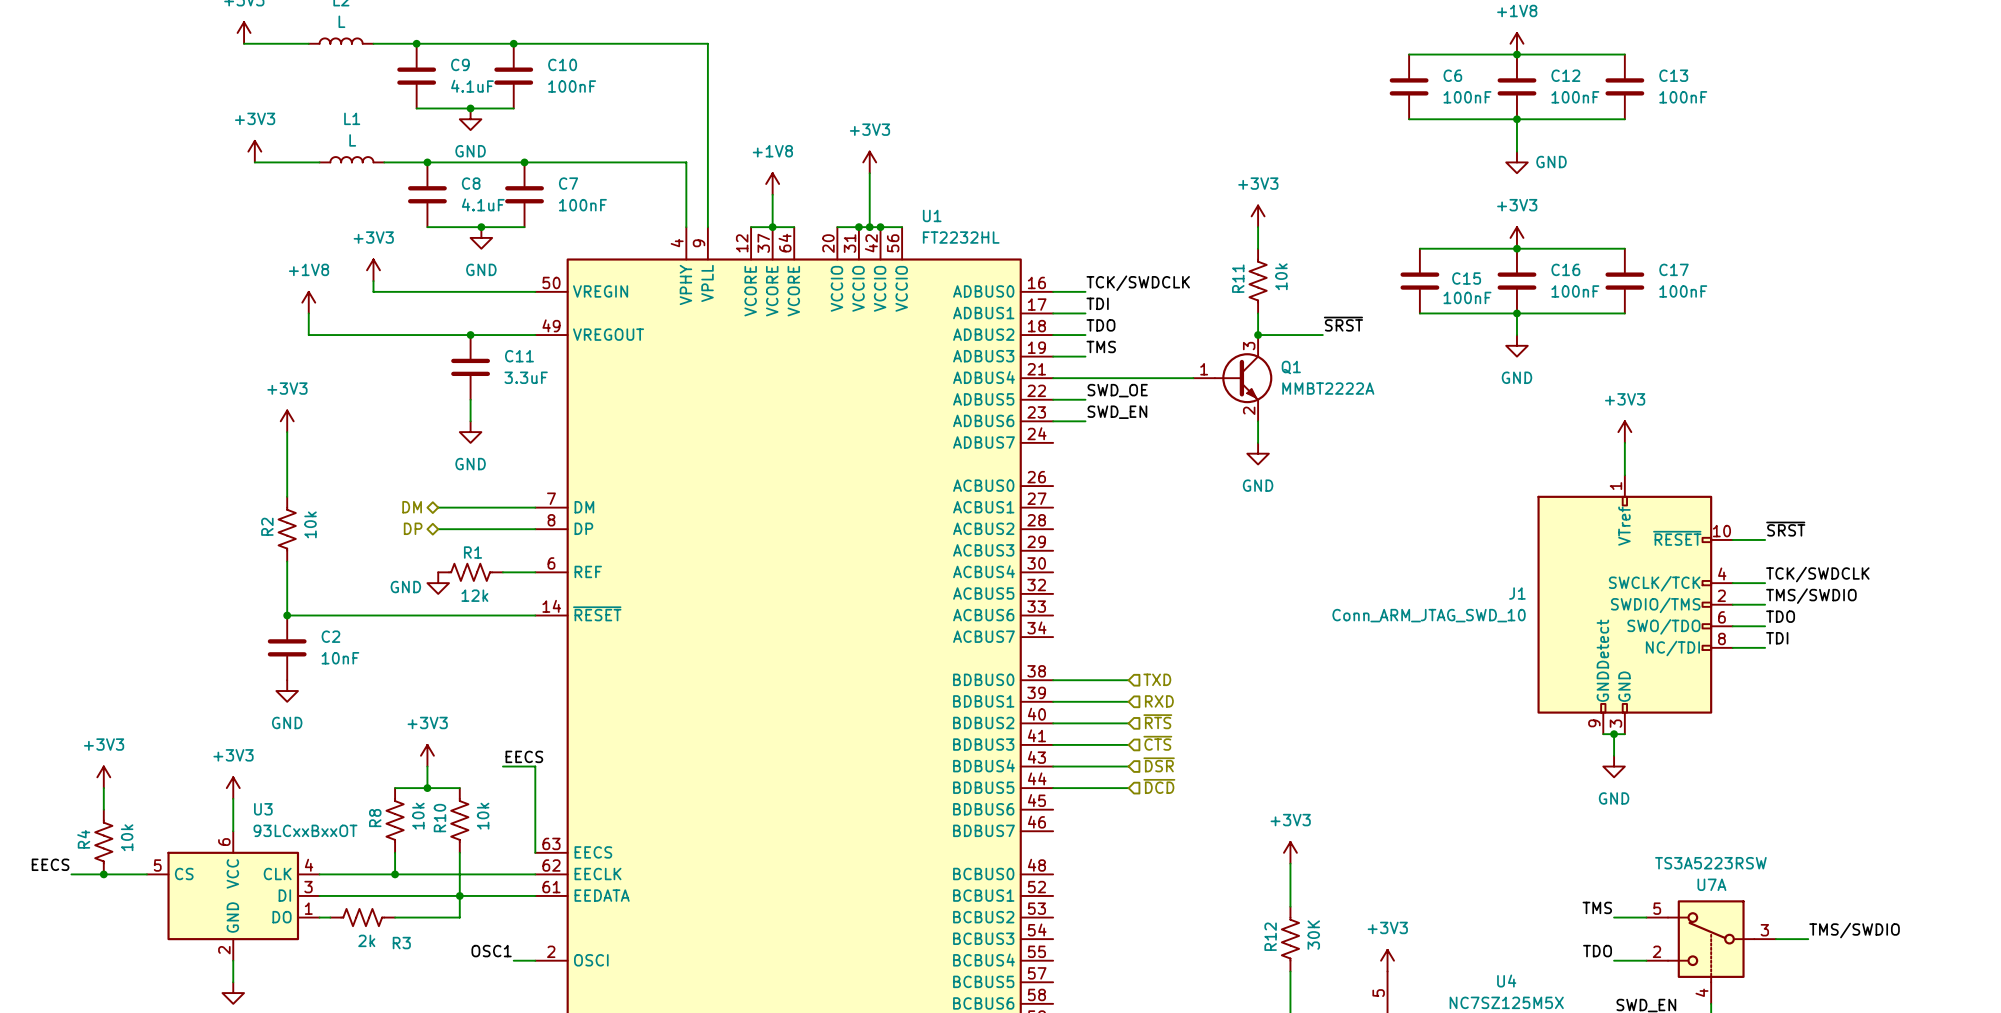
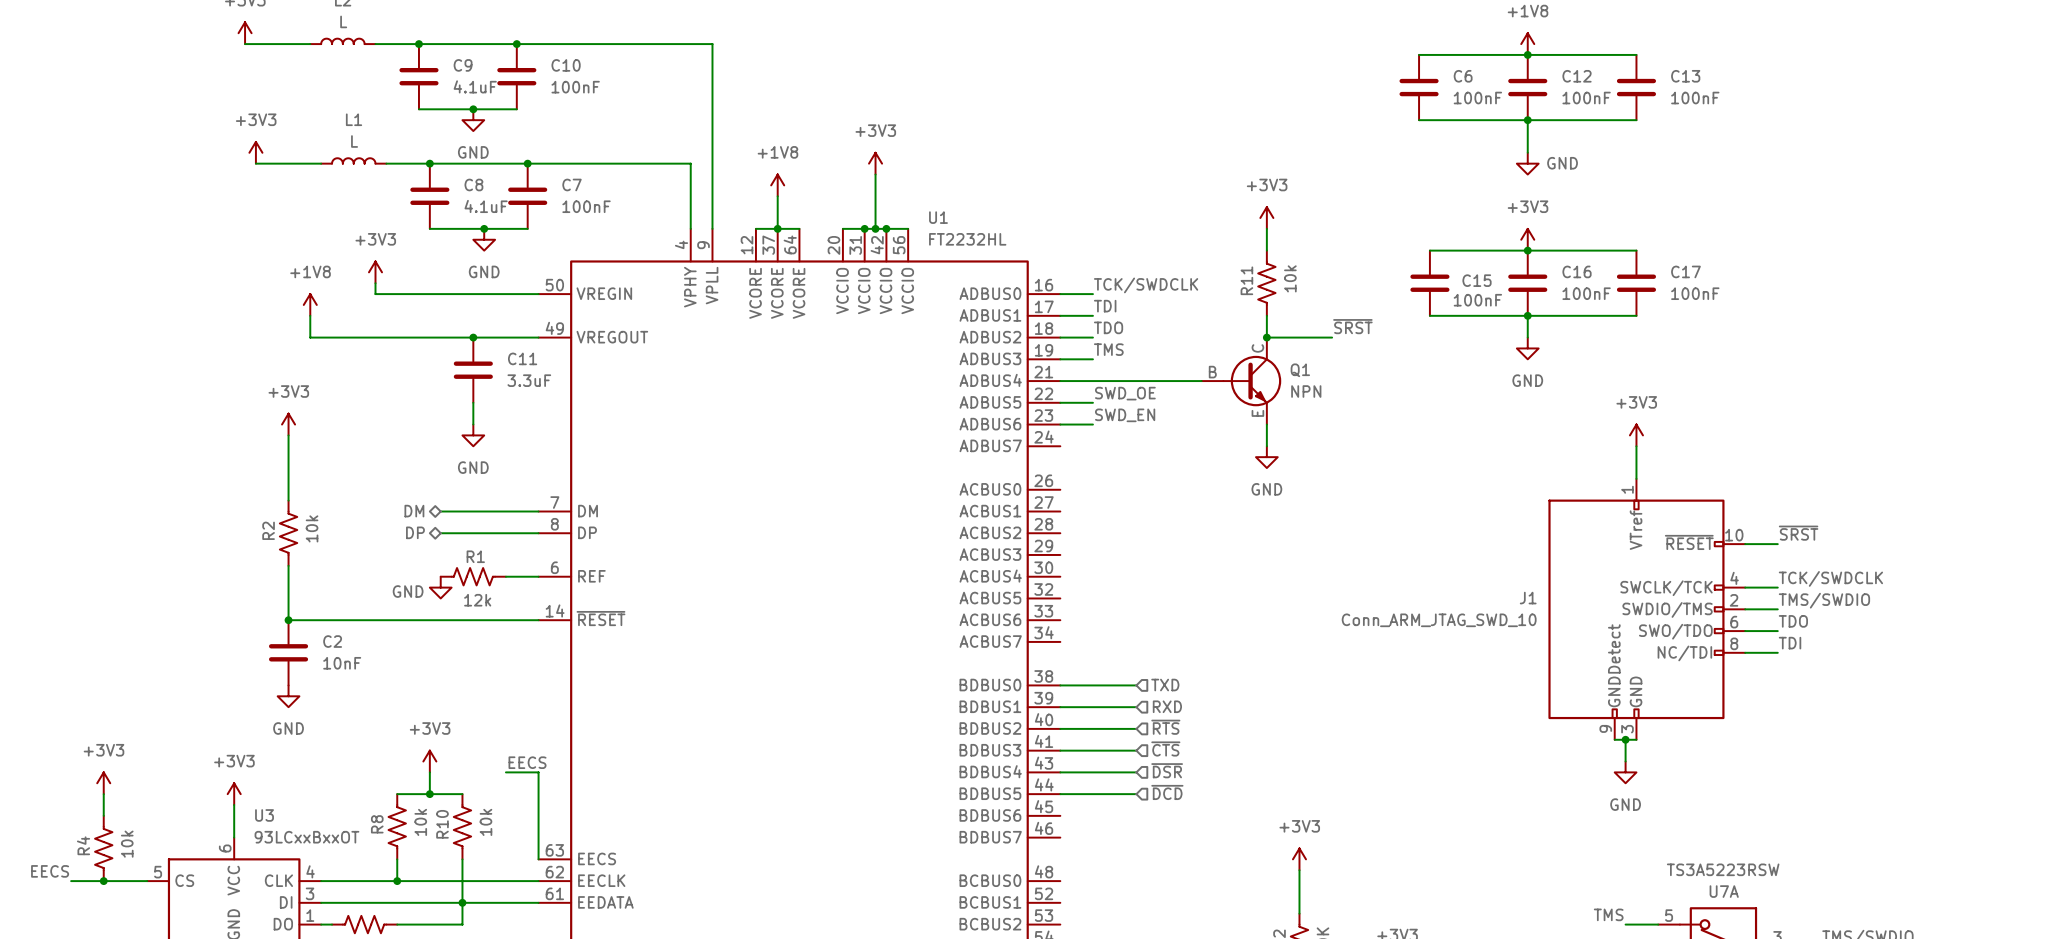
Q1 symbol: [1193, 335, 1273, 422] -> [1201, 337, 1282, 425]
Q1 value: MMBT2222A (1328, 388) -> NPN (1306, 391)

